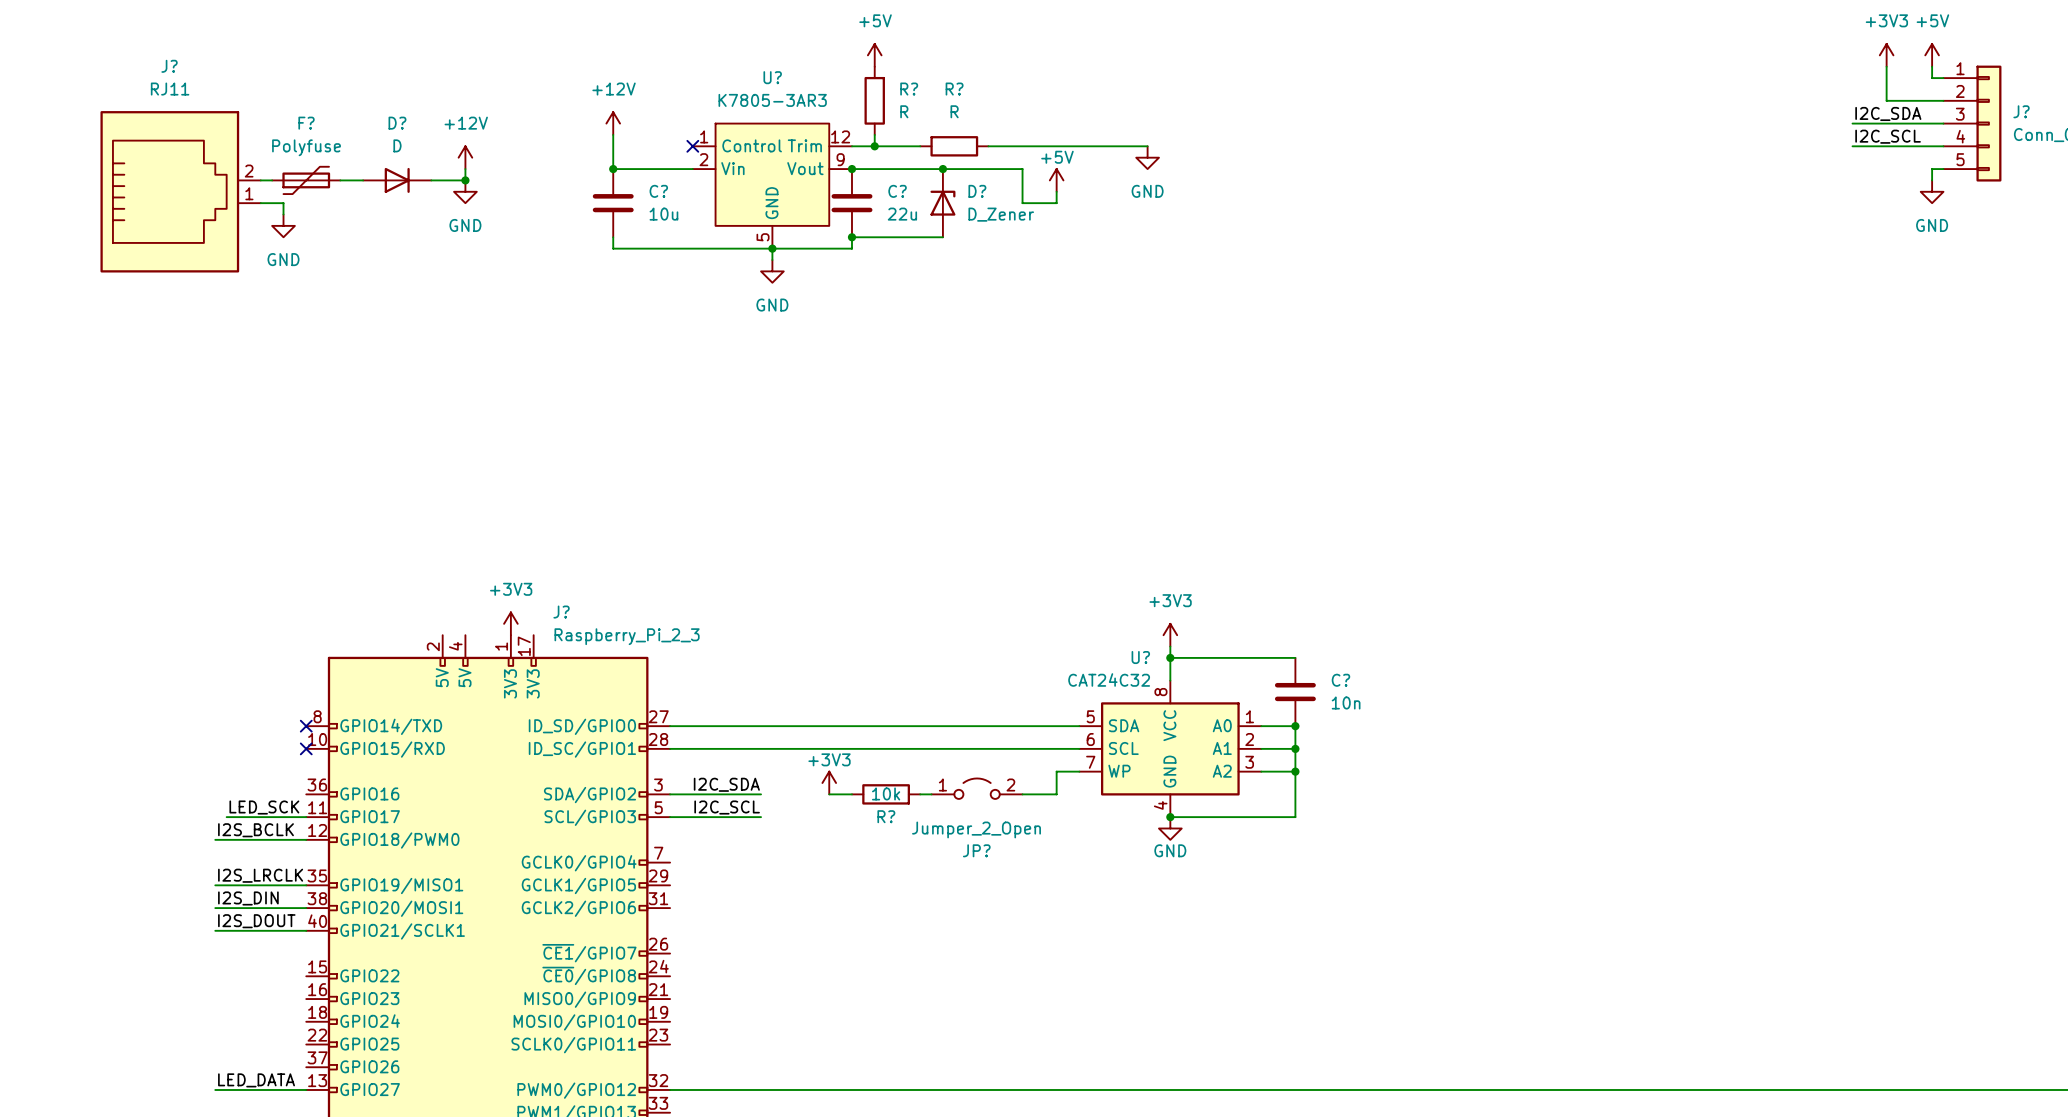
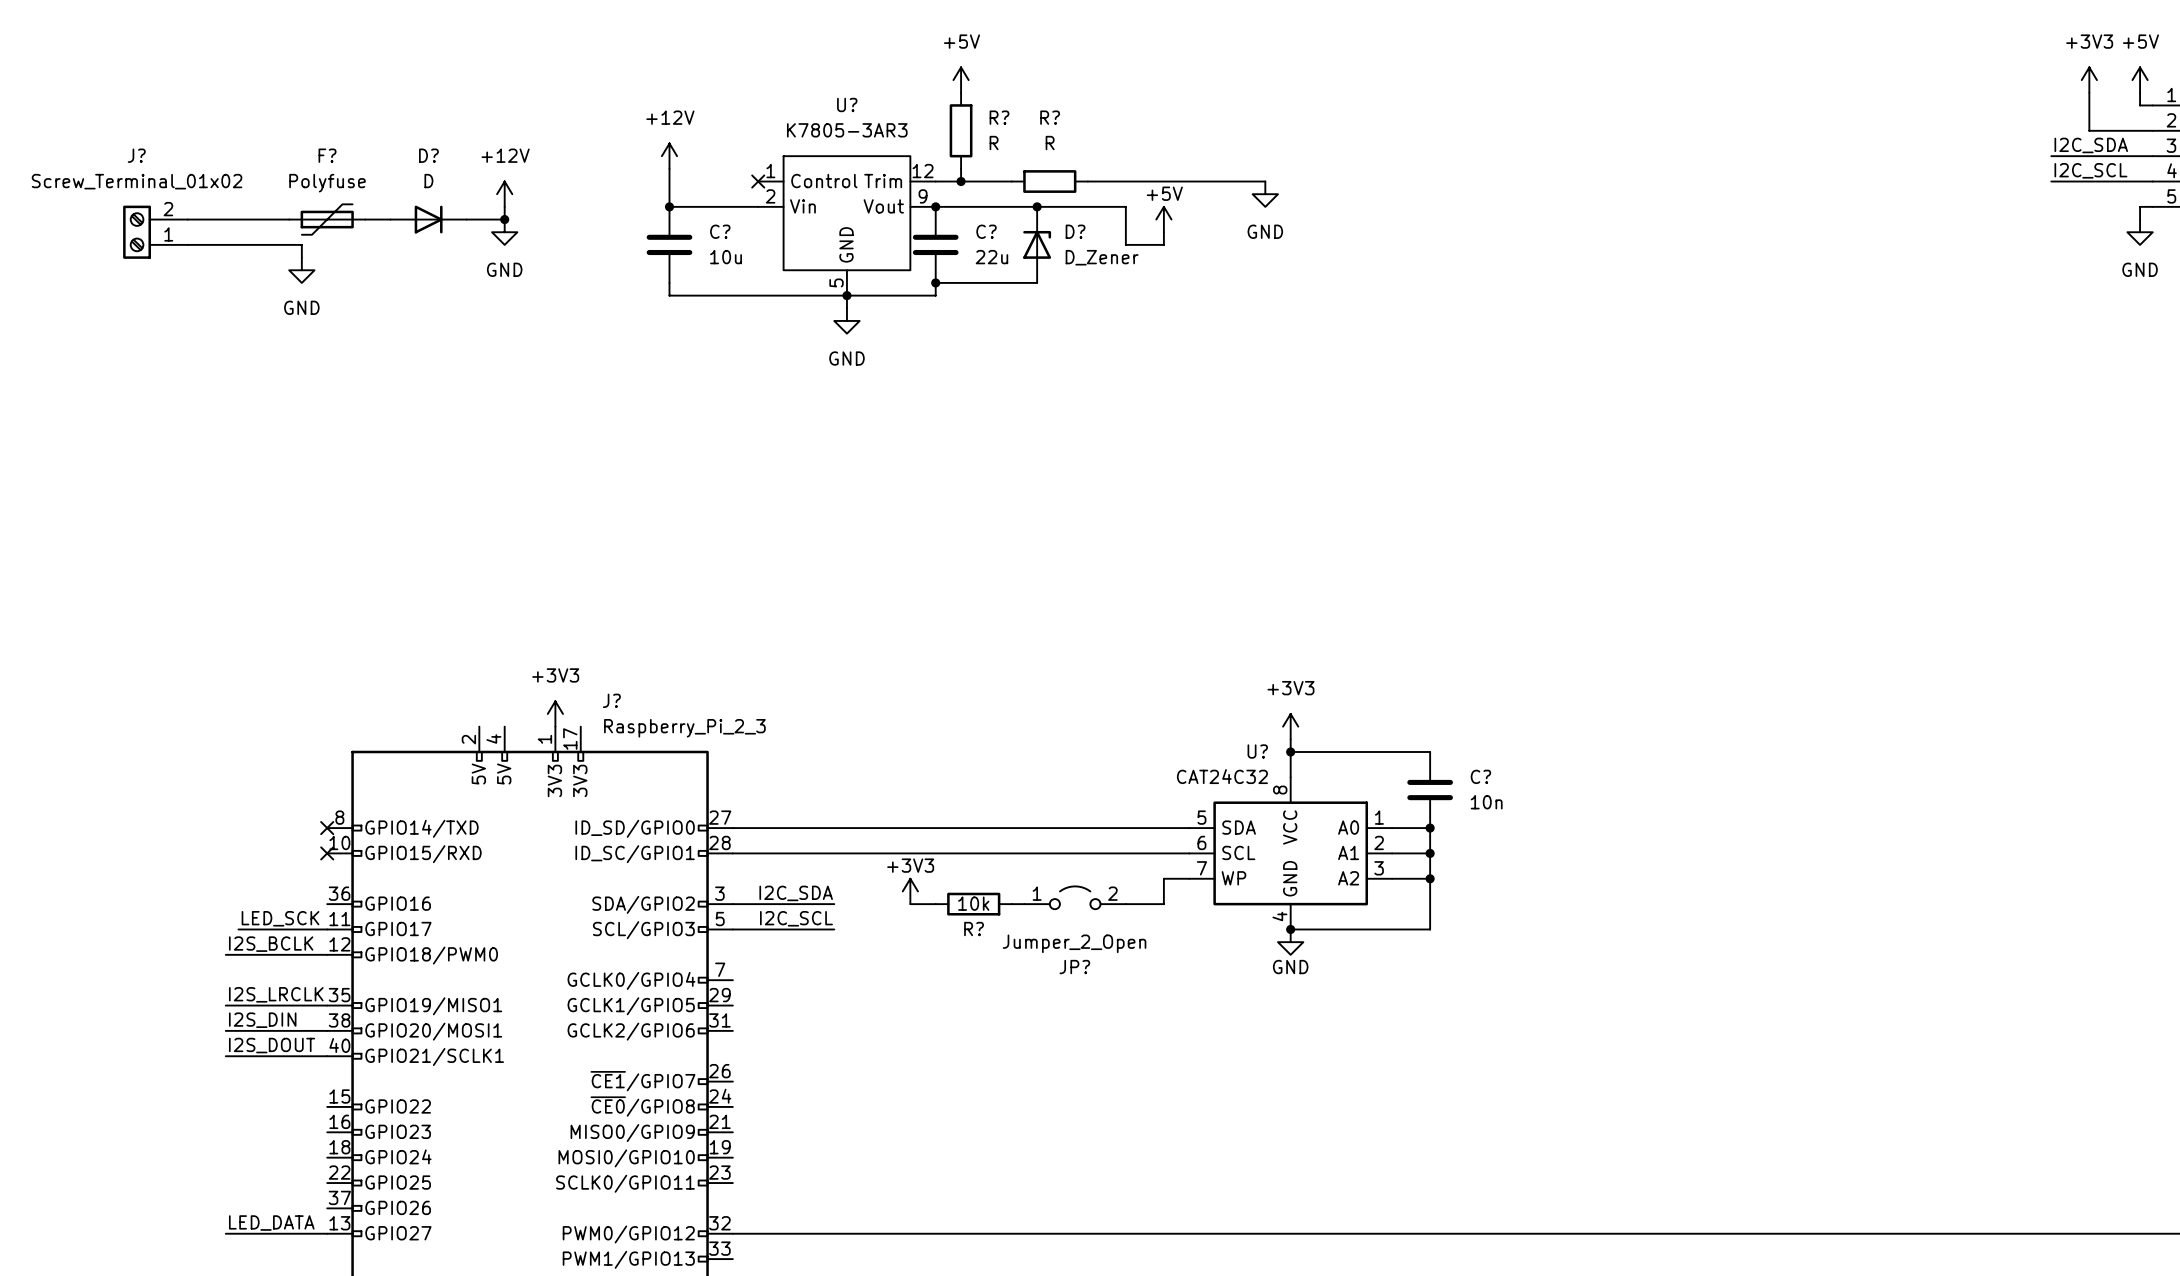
J?: none -> Screw_Terminal_01x02 (155, 232)
J?: RJ11 (180, 191) -> none

